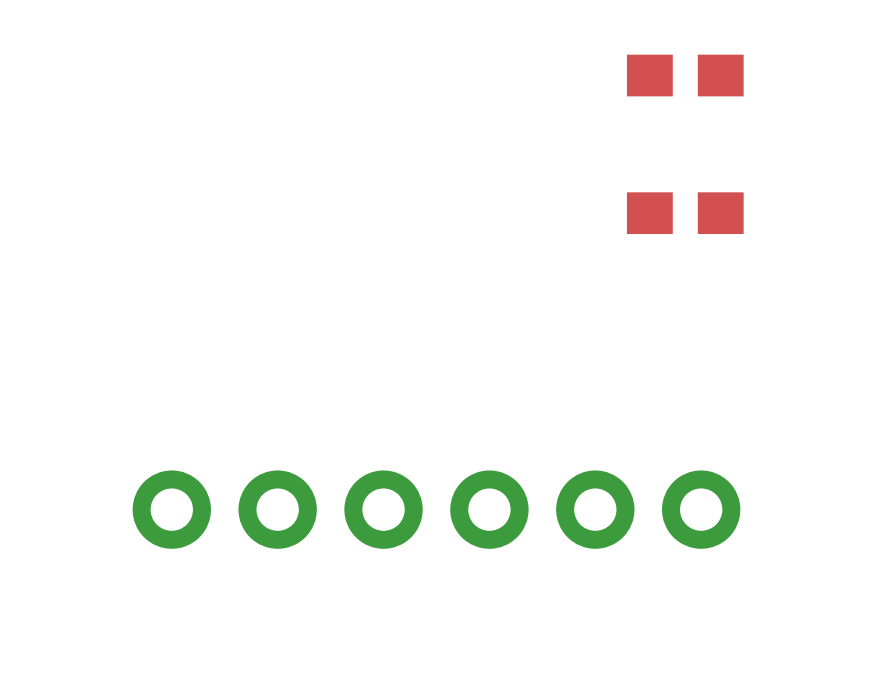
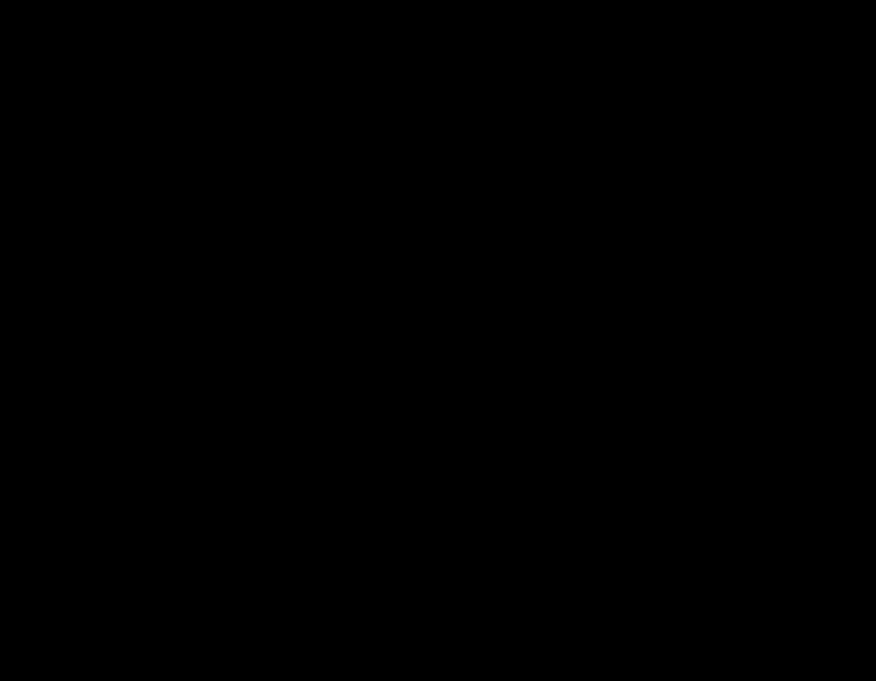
part: (685, 75) -> none
part: (685, 213) -> none
part: (436, 509) -> none

